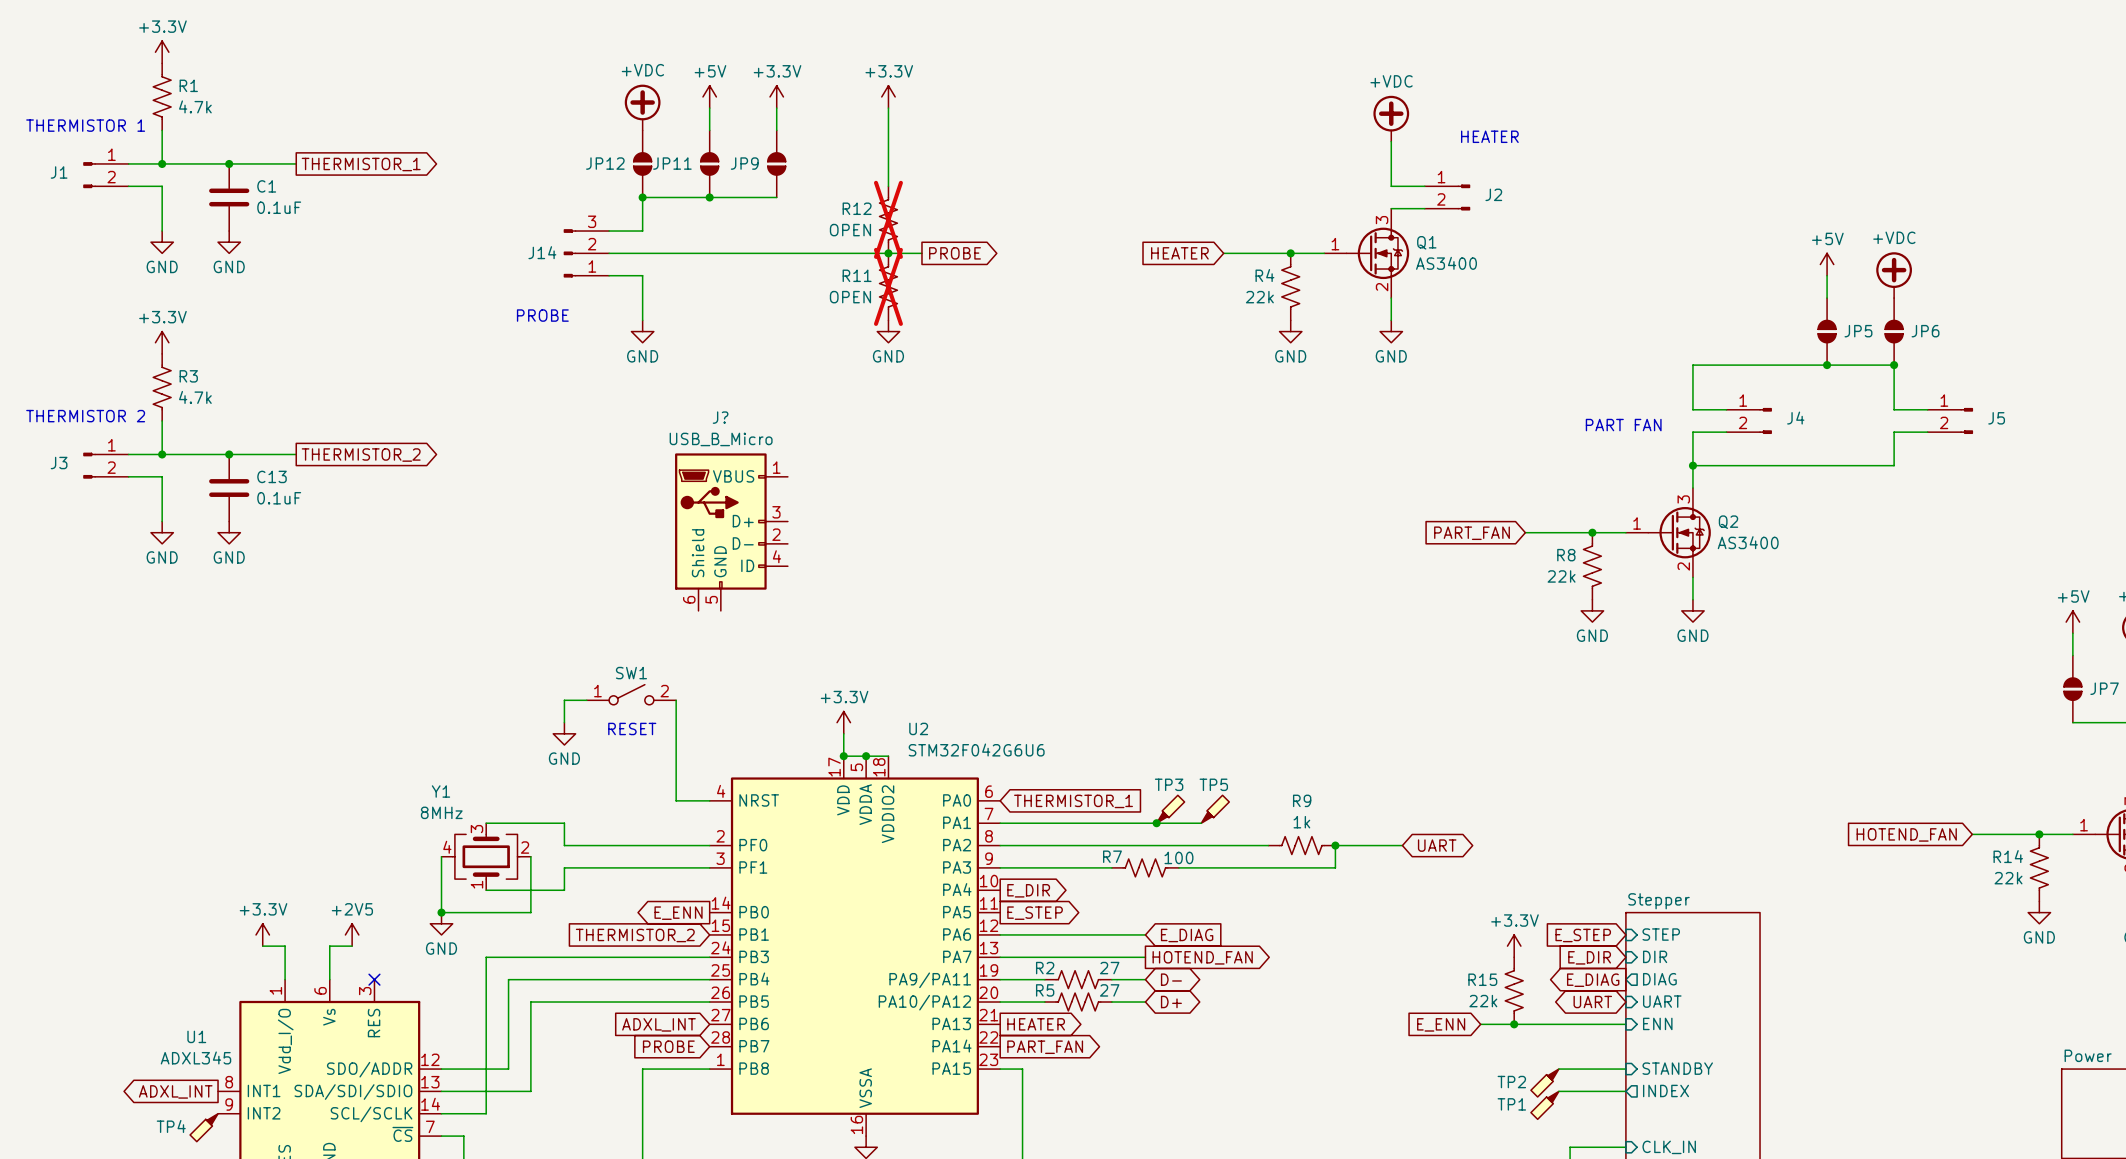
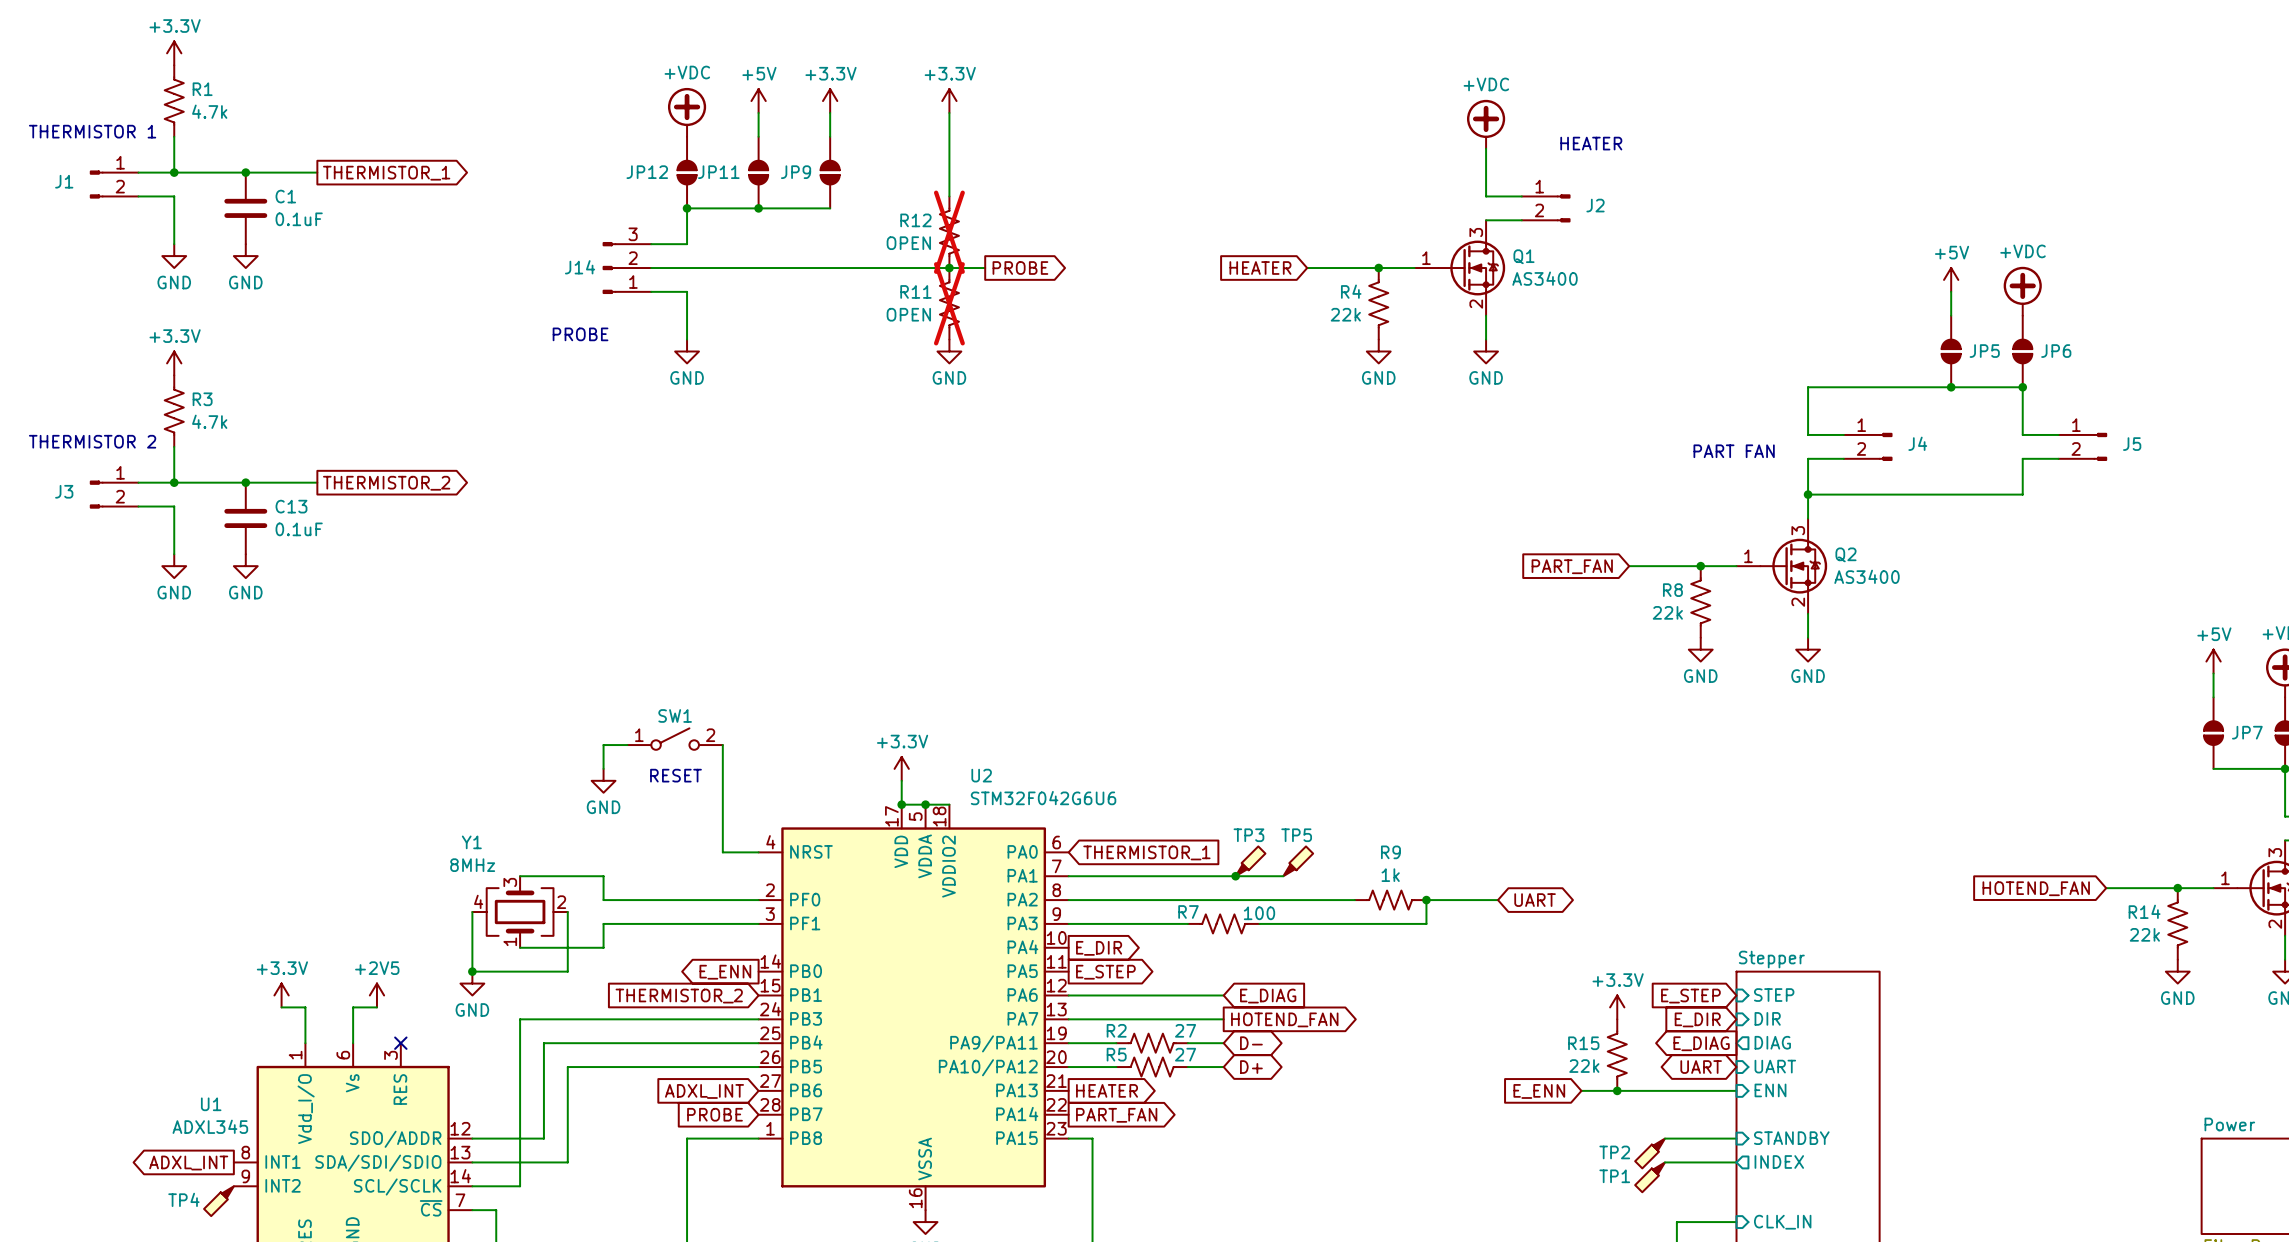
J?: USB_B_Micro (731, 532) -> none

